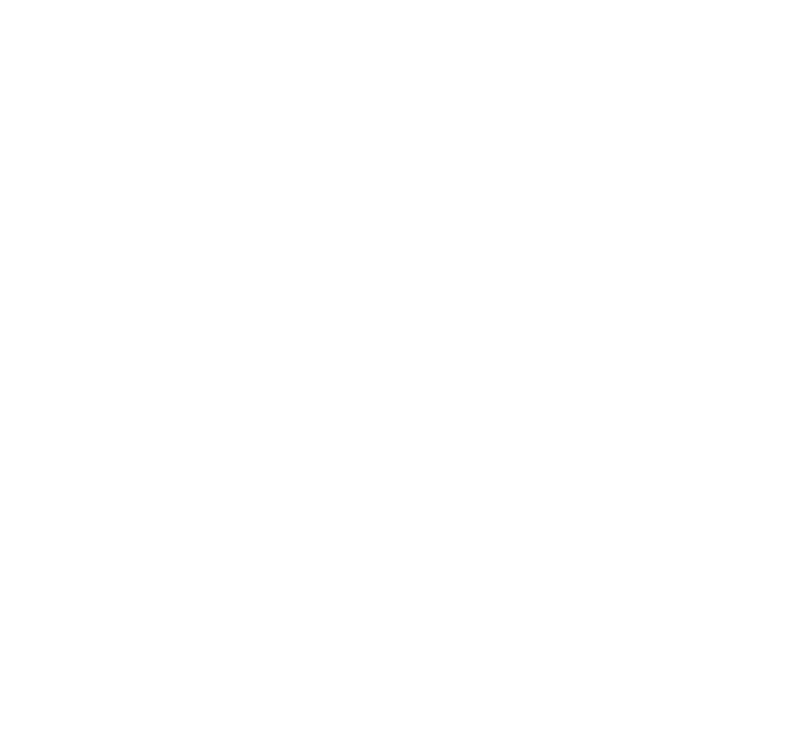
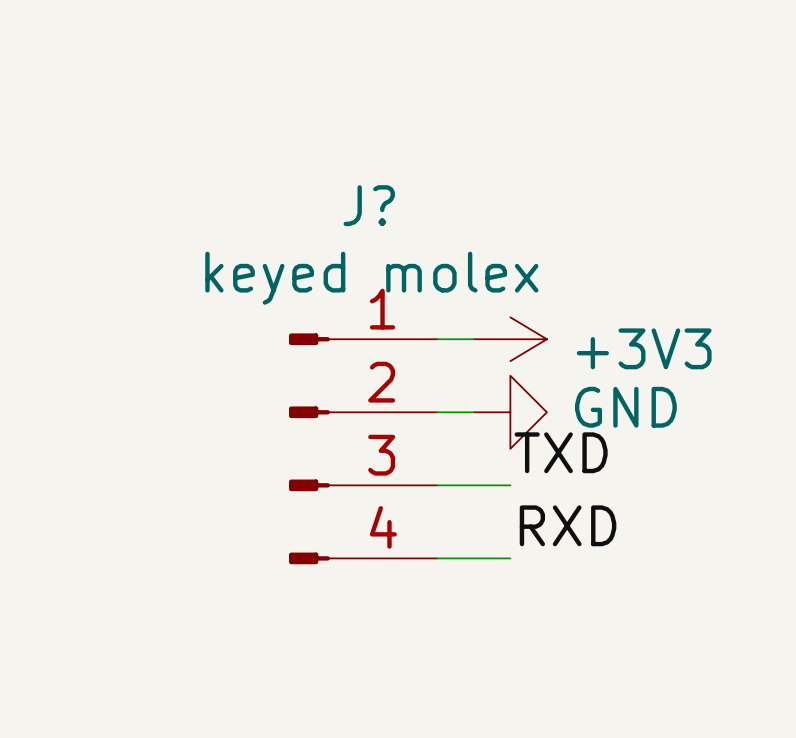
wire: none -> (437, 339) (473, 339)
power symbol: none -> +3V3 (510, 339)
wire: none -> (437, 412) (473, 412)
power symbol: none -> GND (510, 412)
J?: none -> keyed molex (363, 448)
label: none -> TXD (561, 452)
wire: none -> (437, 485) (510, 485)
label: none -> RXD (568, 525)
wire: none -> (437, 558) (510, 558)

